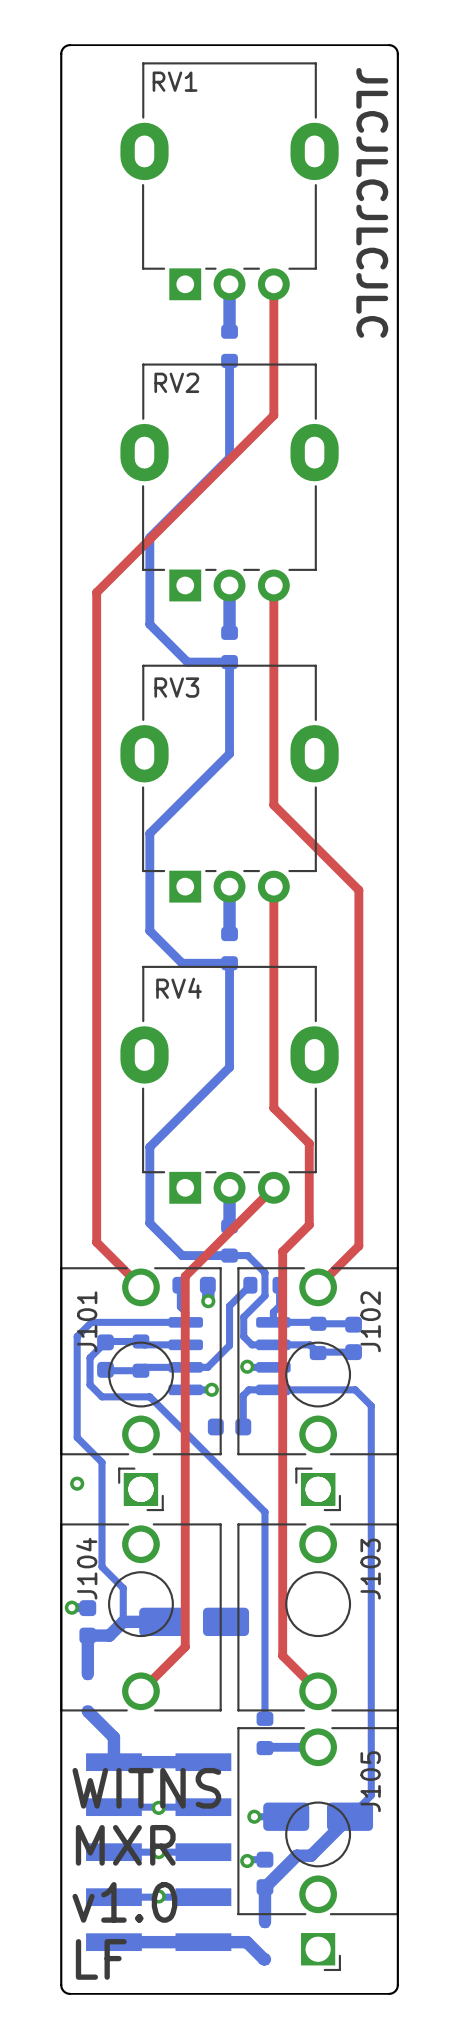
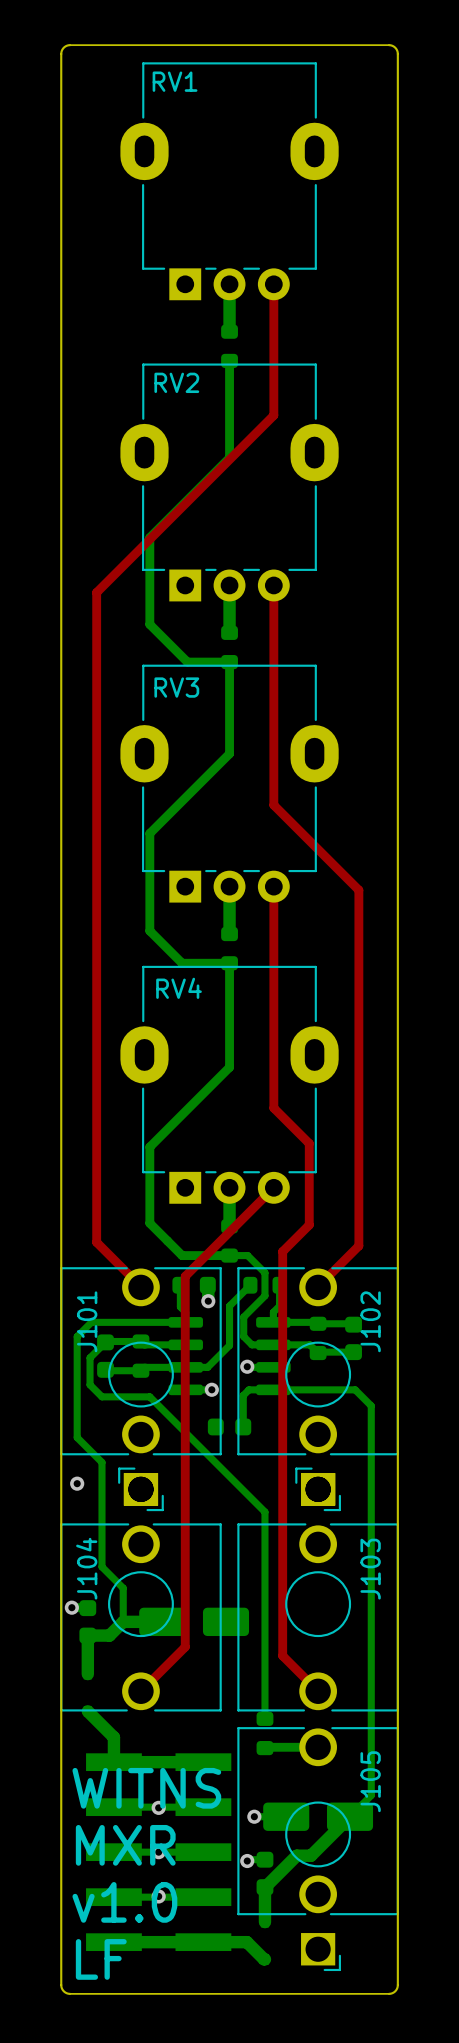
text: JLCJLCJLCJLC (372, 202) -> none

